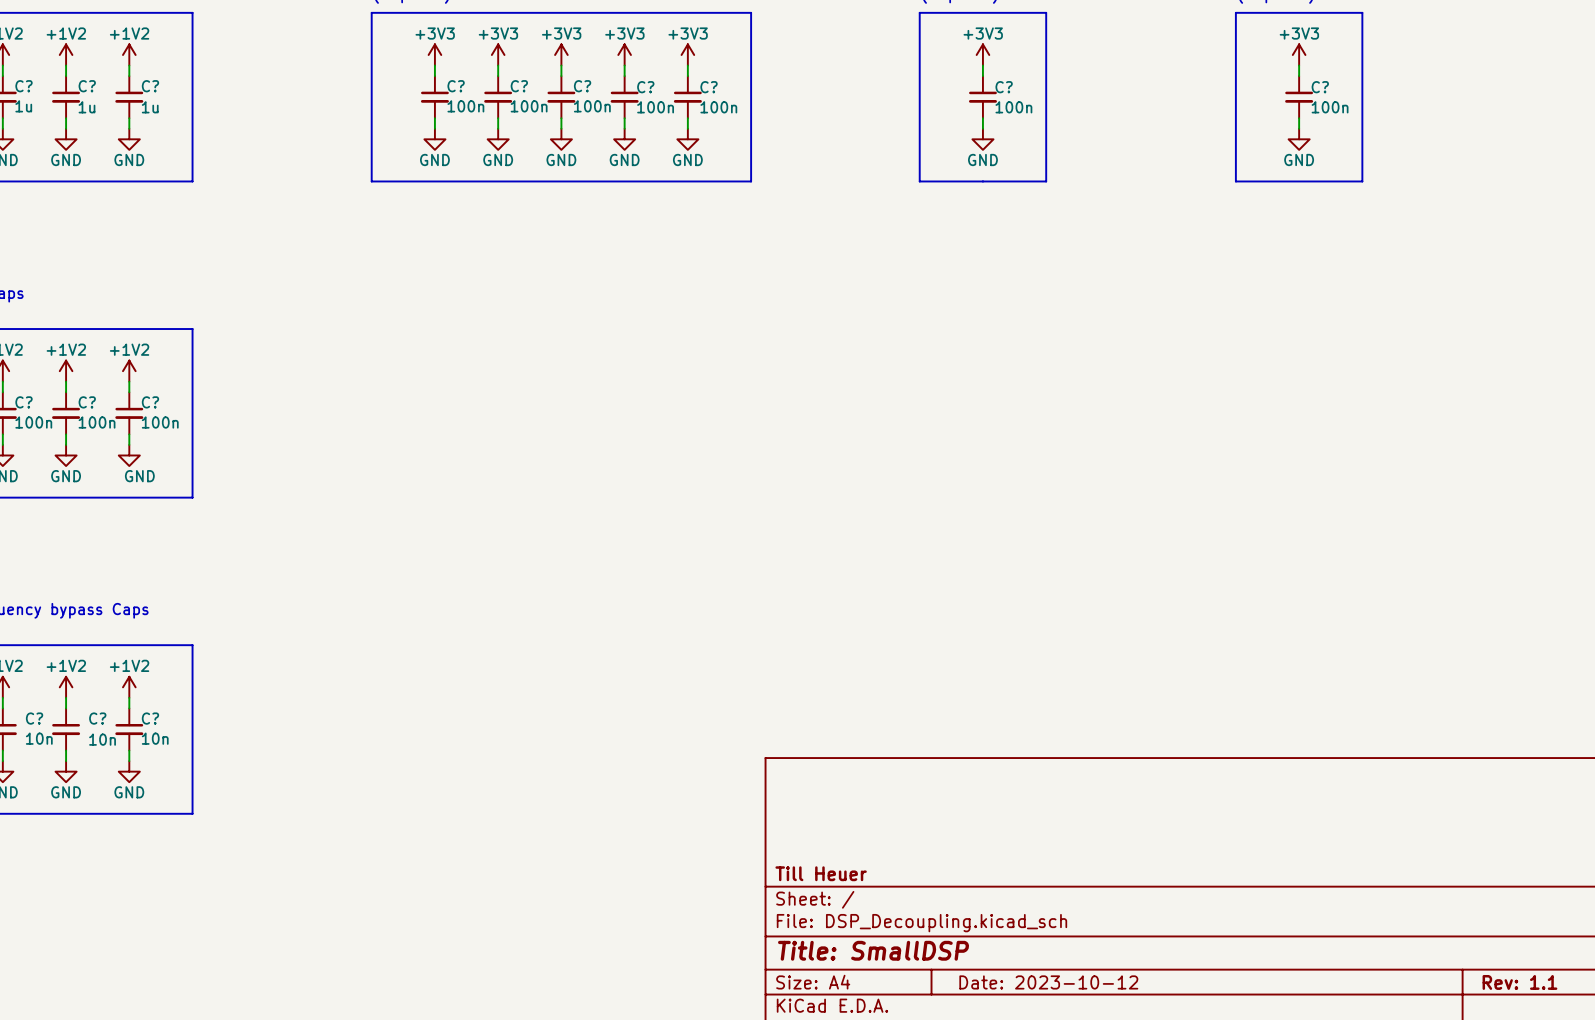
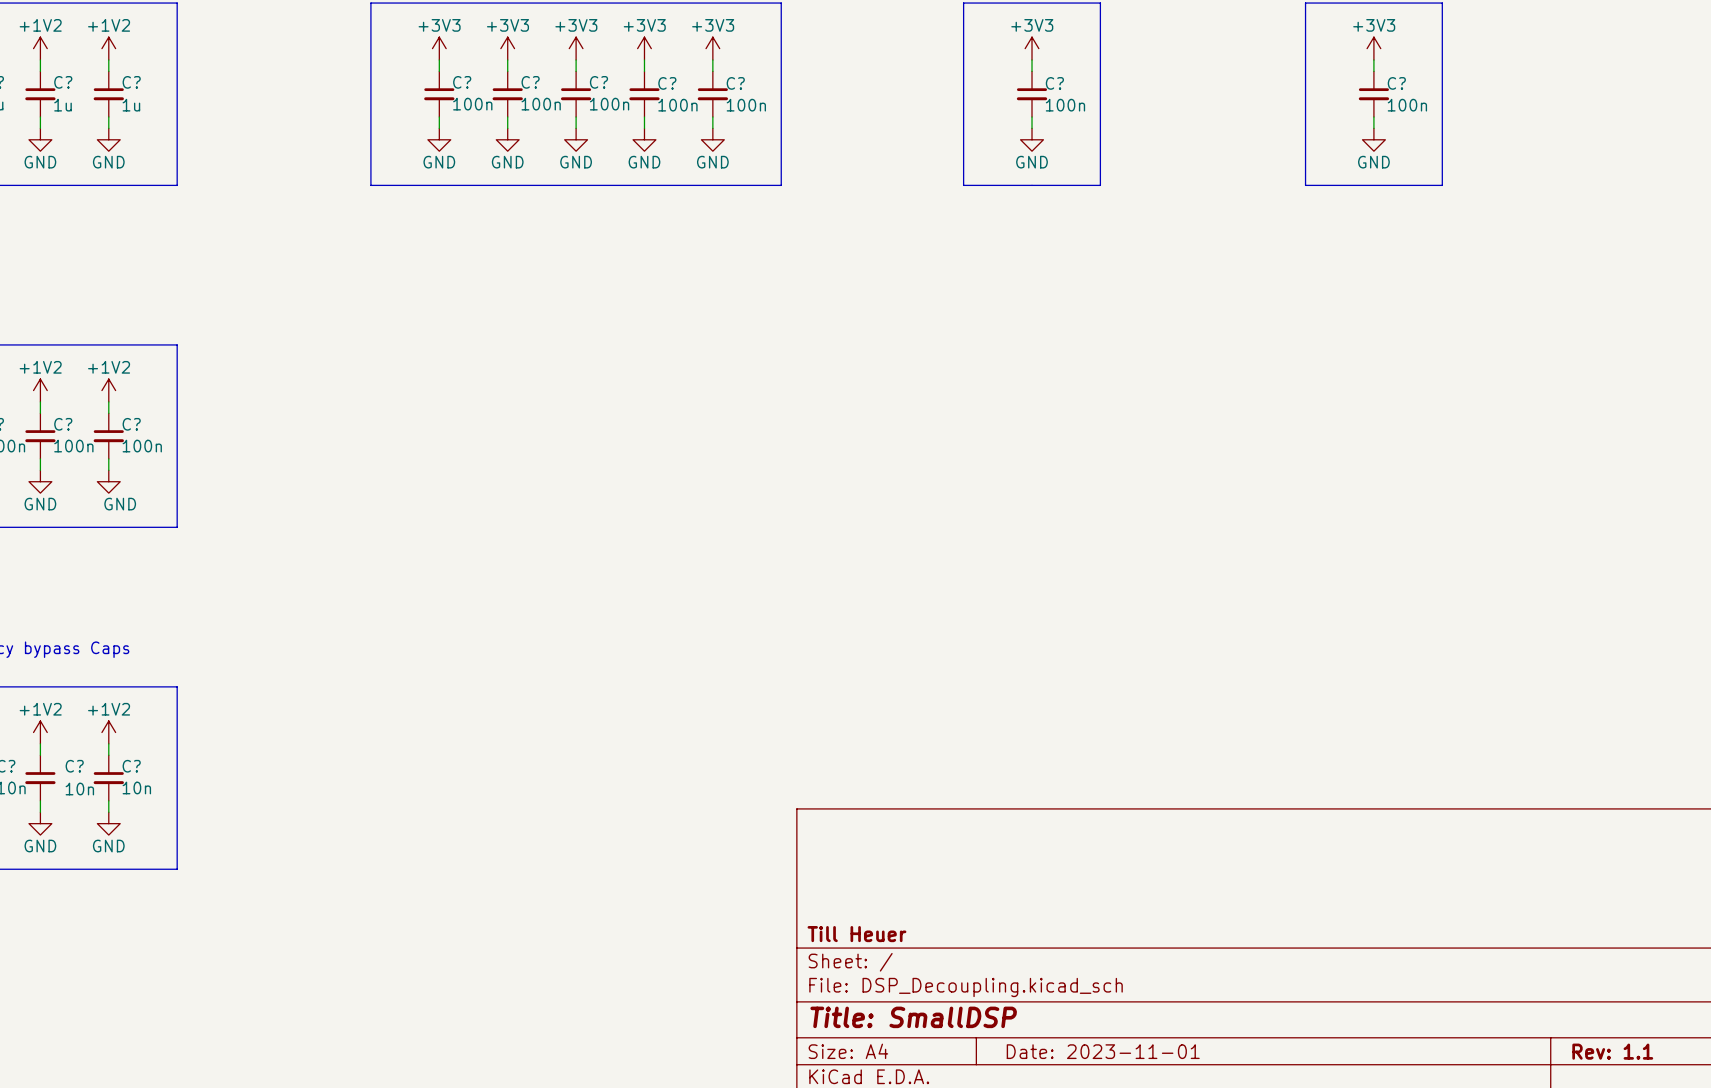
title block: Date: 2023-10-12 (1048, 982) -> Date: 2023-11-01 (1103, 1051)

